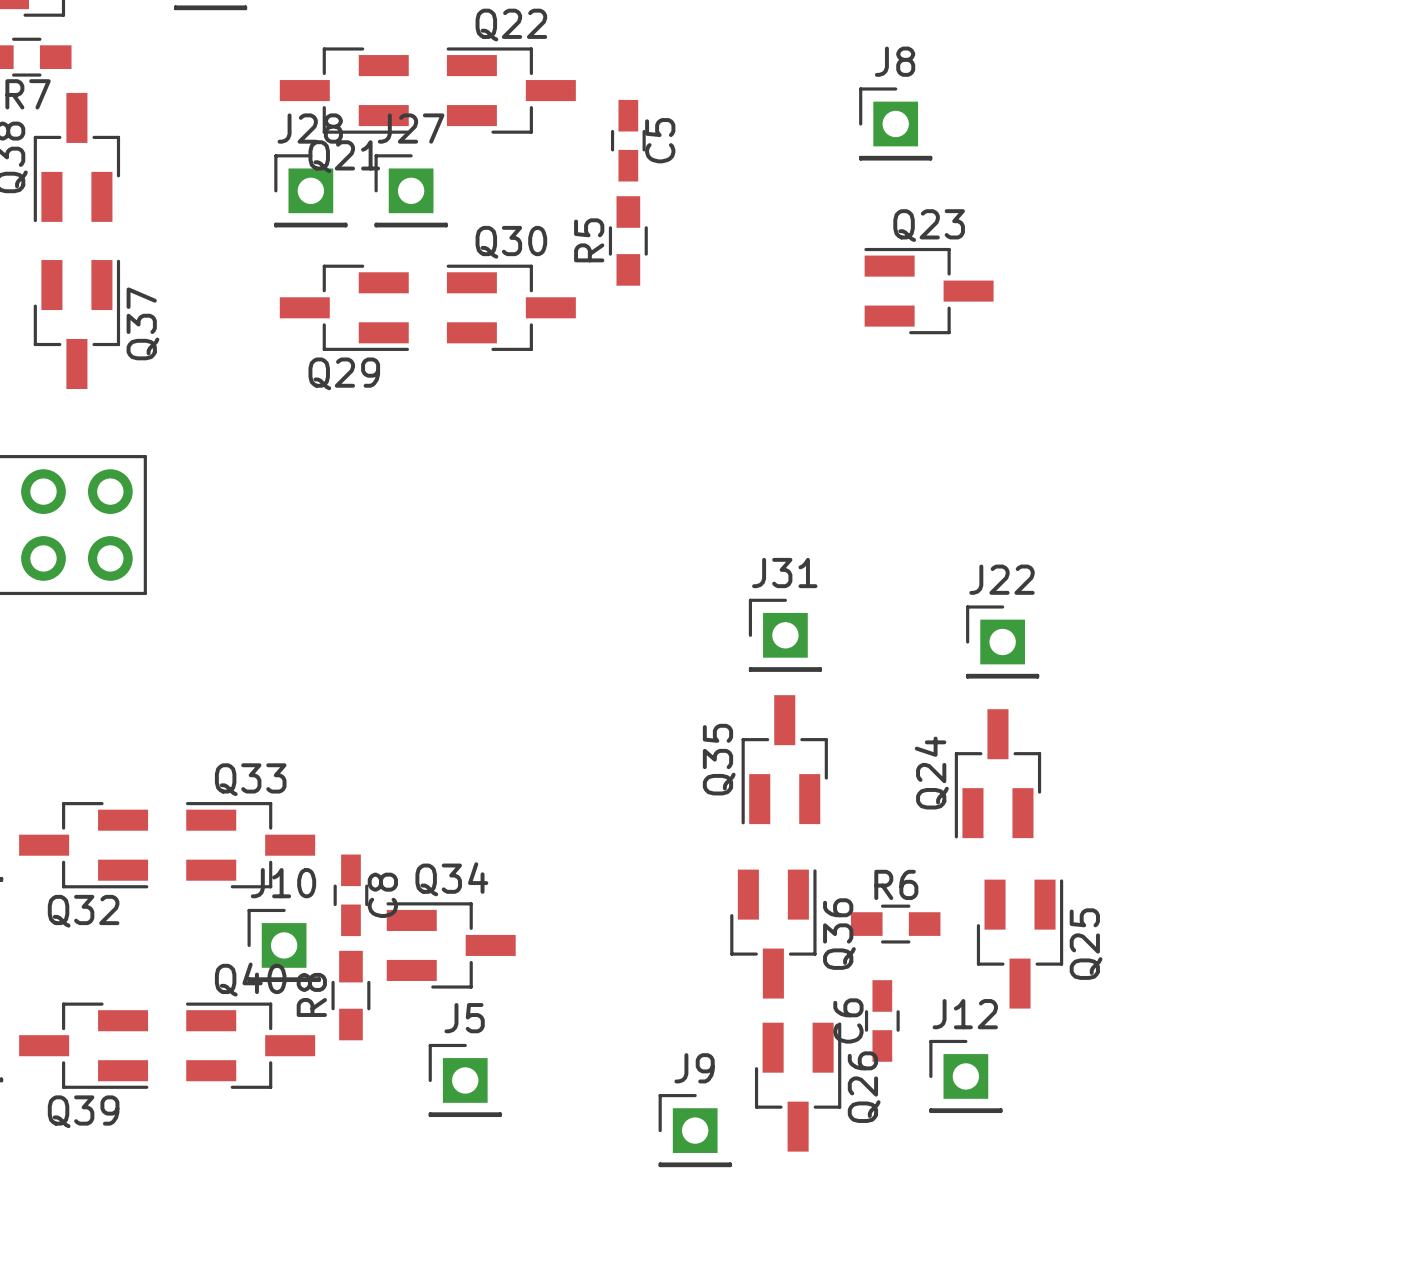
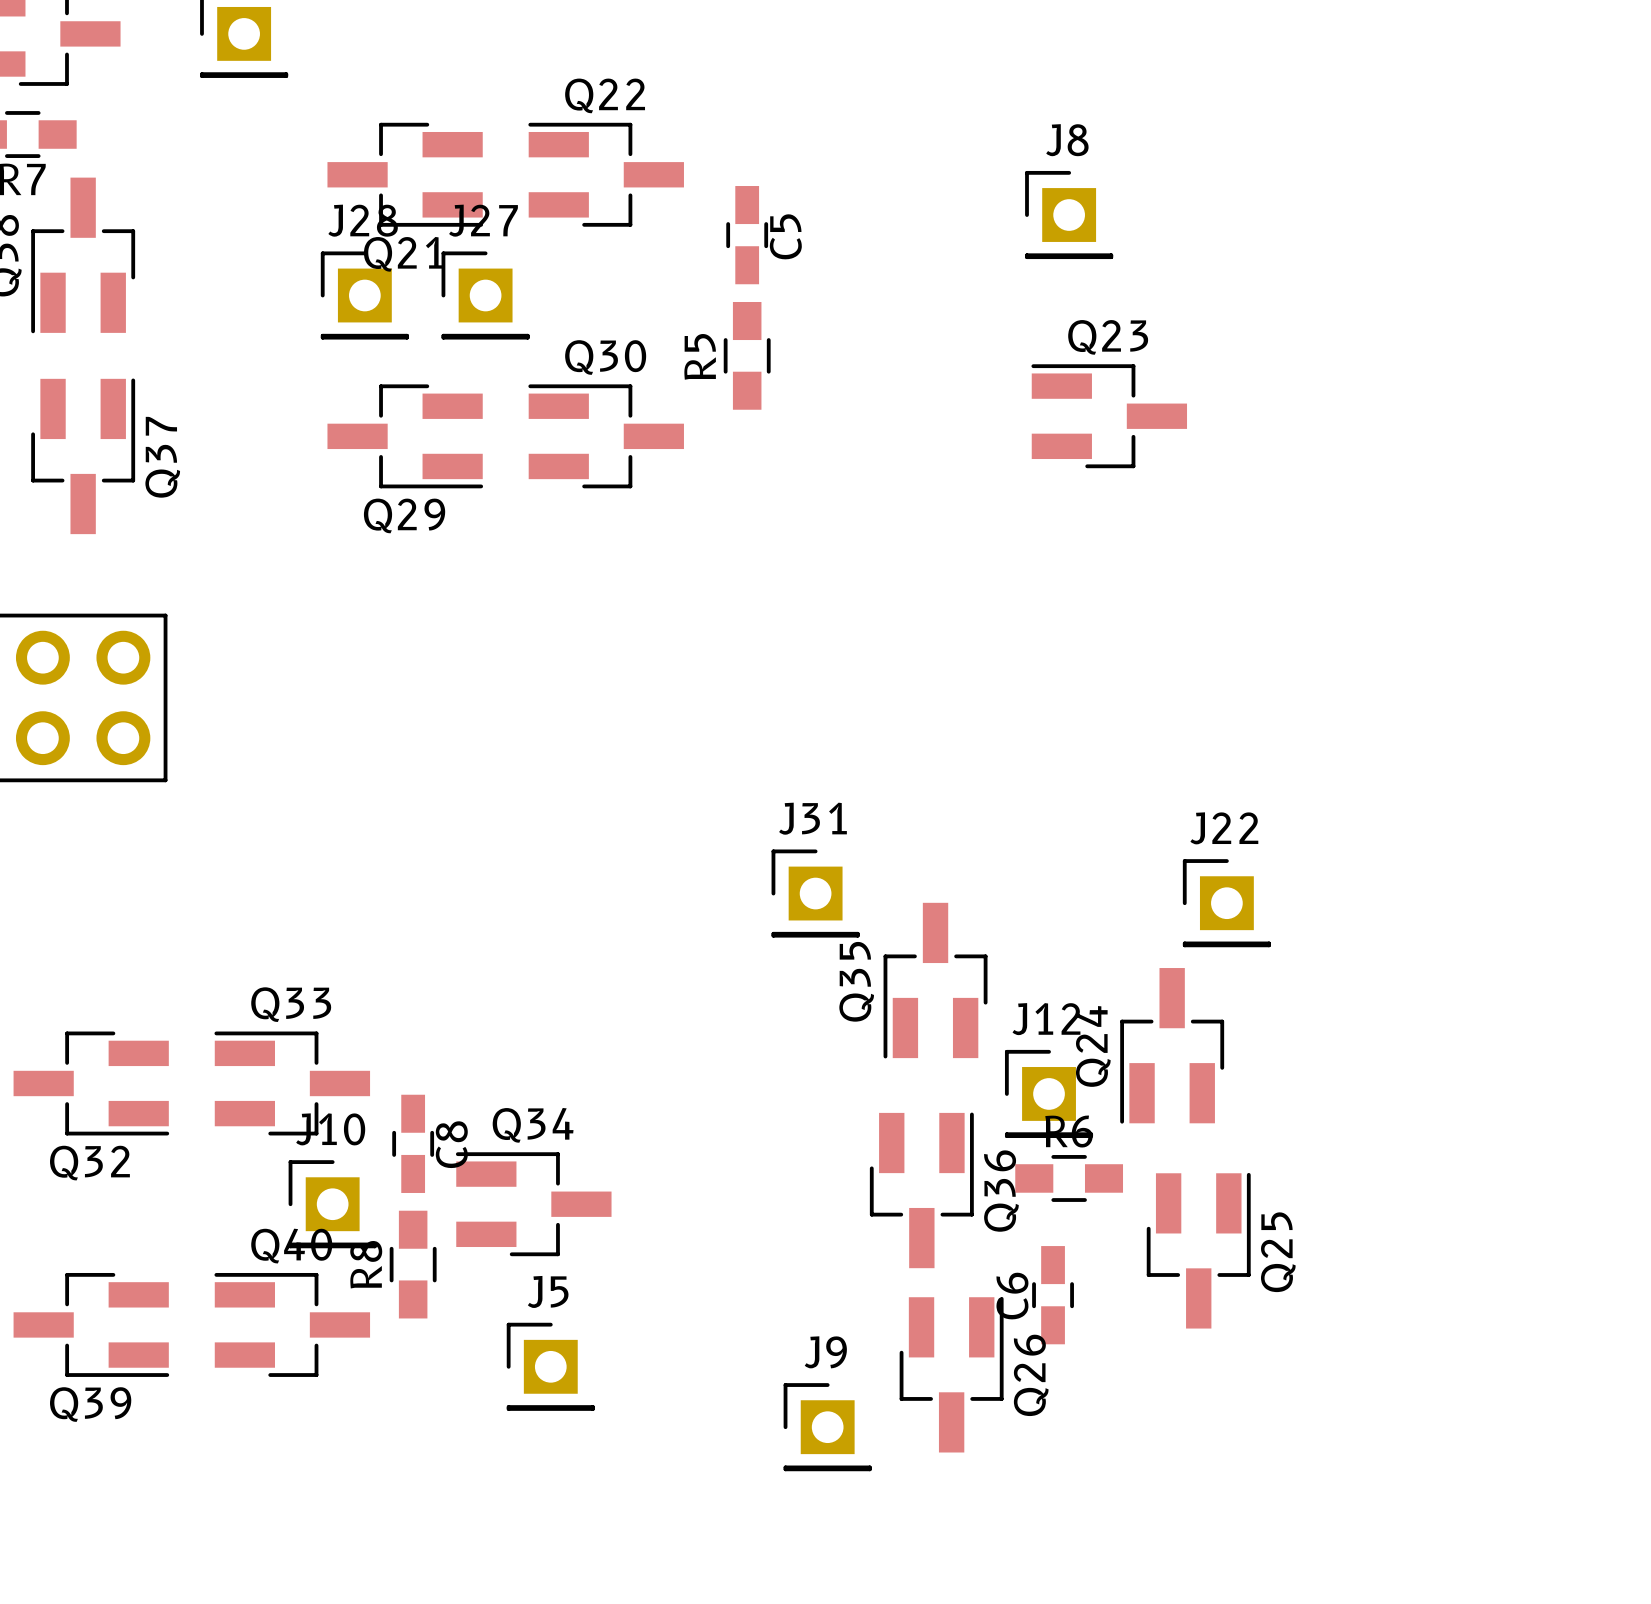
J31 position: (785, 635) -> (815, 893)
J22 position: (1002, 641) -> (1226, 903)
Q24 position: (997, 773) -> (1172, 1045)
Q25 position: (1020, 943) -> (1198, 1250)
J12 position: (965, 1076) -> (1049, 1093)

